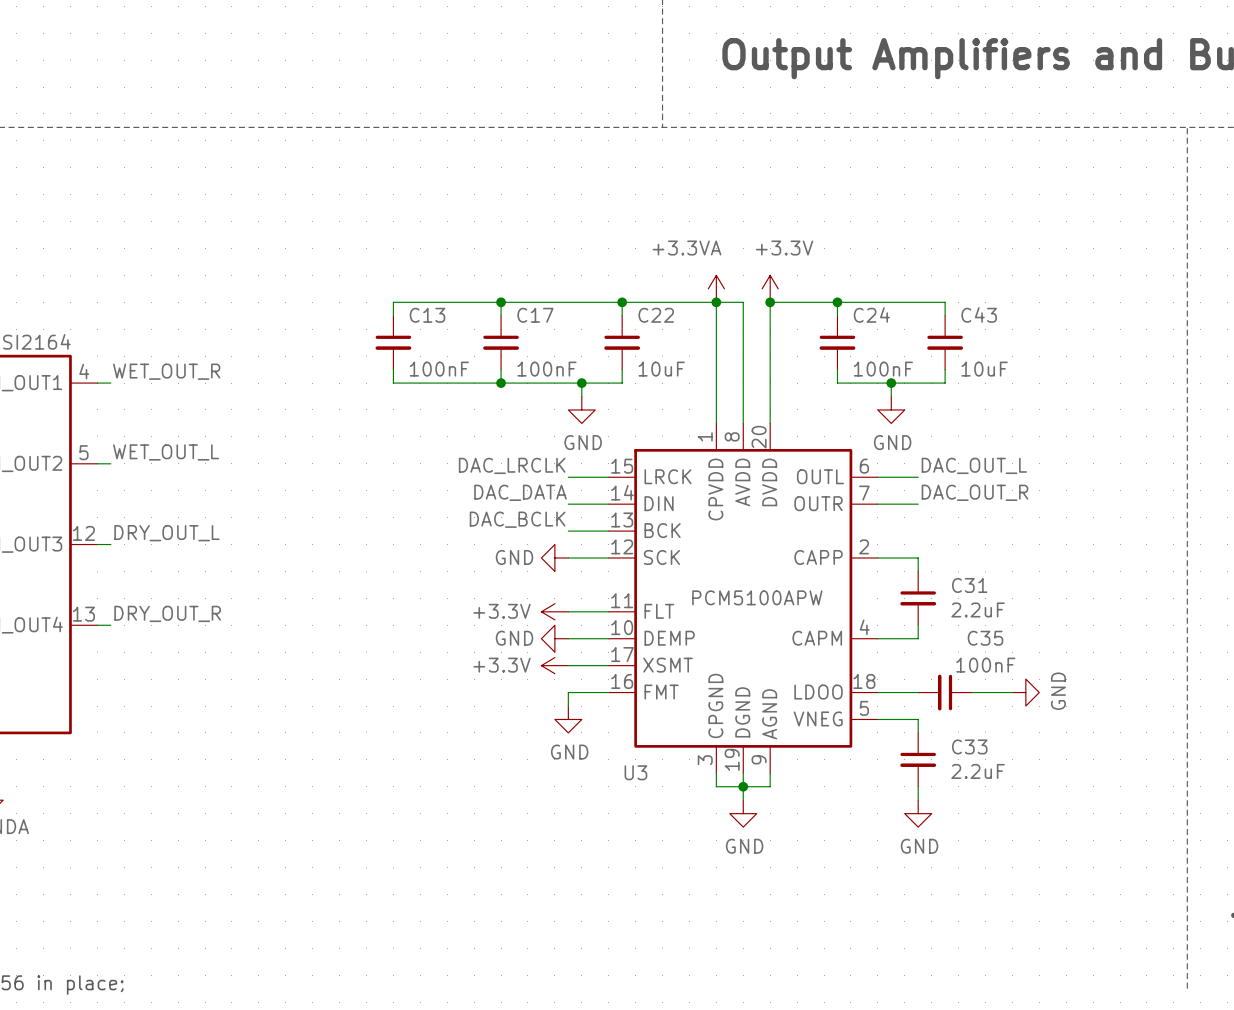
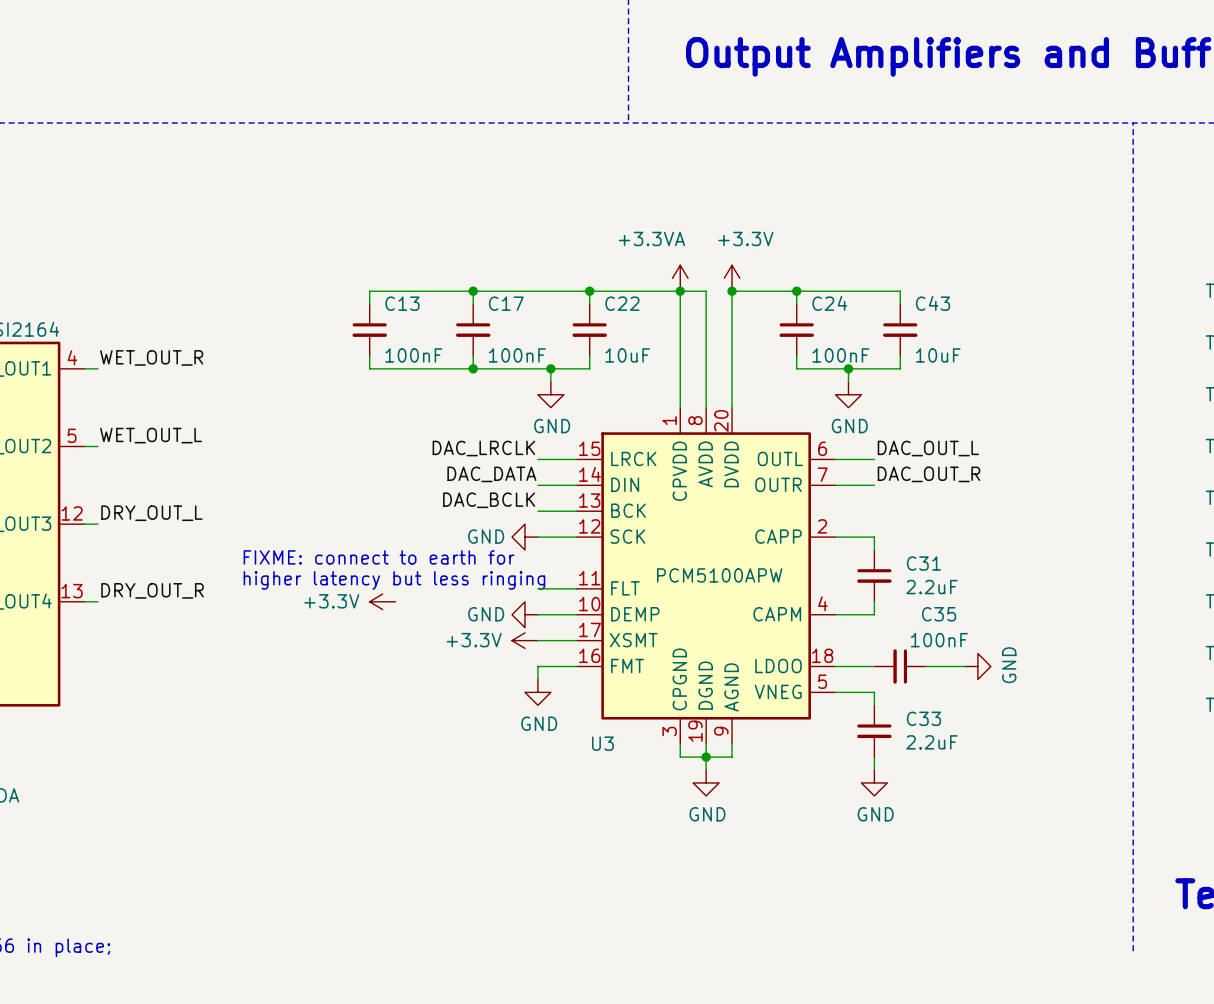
text: none -> FIXME: connect to earth for (379, 557)
text: none -> higher latency but less ringing (394, 580)
power symbol position: +3.3V (554, 611) -> +3.3V (382, 601)

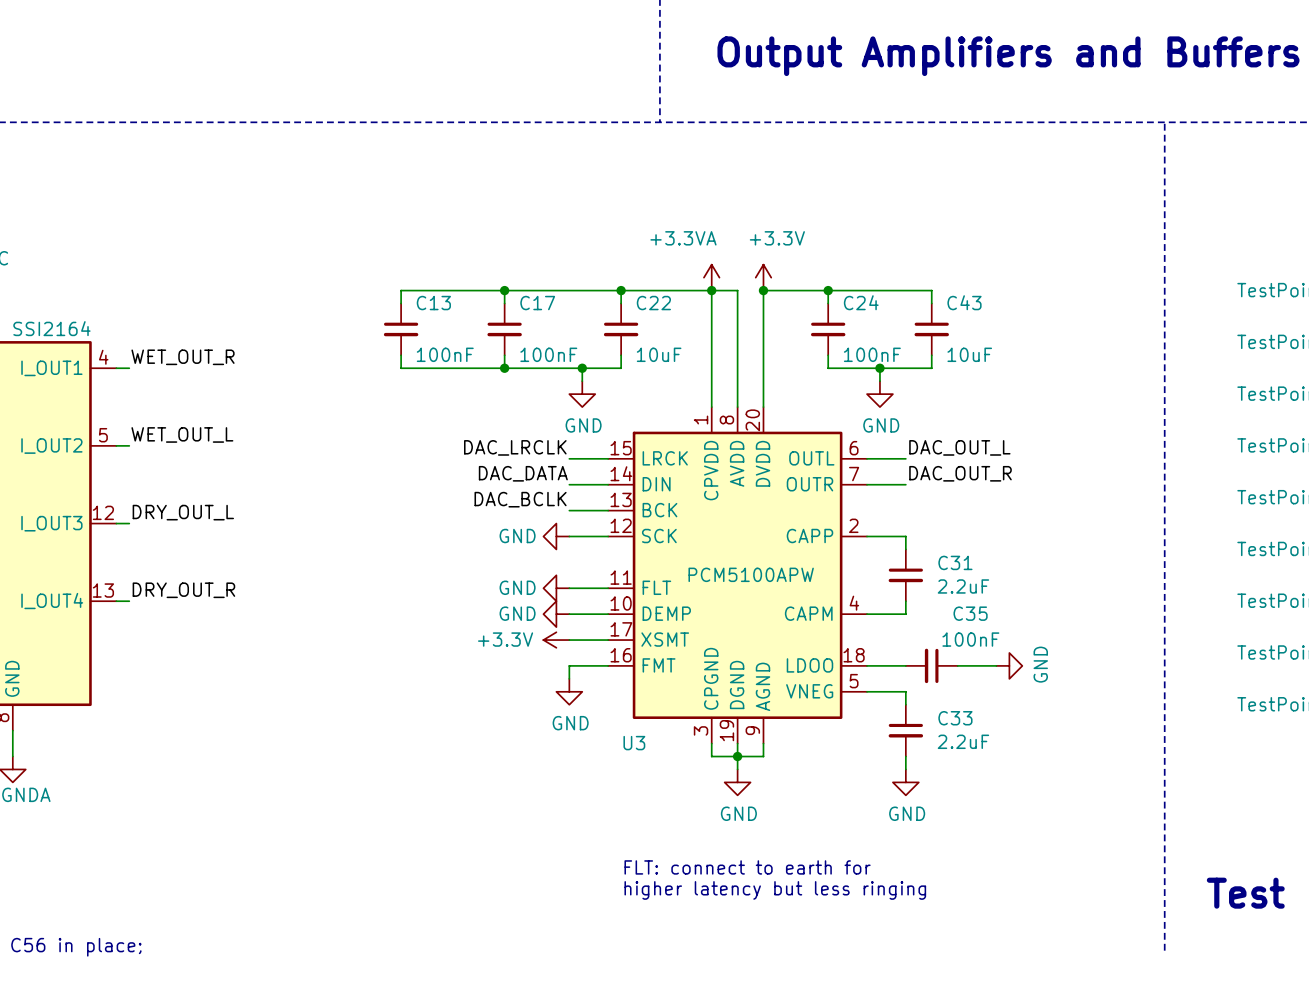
text: FIXME: connect to earth for (379, 557) -> none
text: higher latency but less ringing (394, 580) -> none
power symbol: none -> GND (556, 588)
power symbol: +3.3V (382, 601) -> none
text: none -> FLT: connect to earth for (747, 867)
text: none -> higher latency but less ringing (775, 890)

